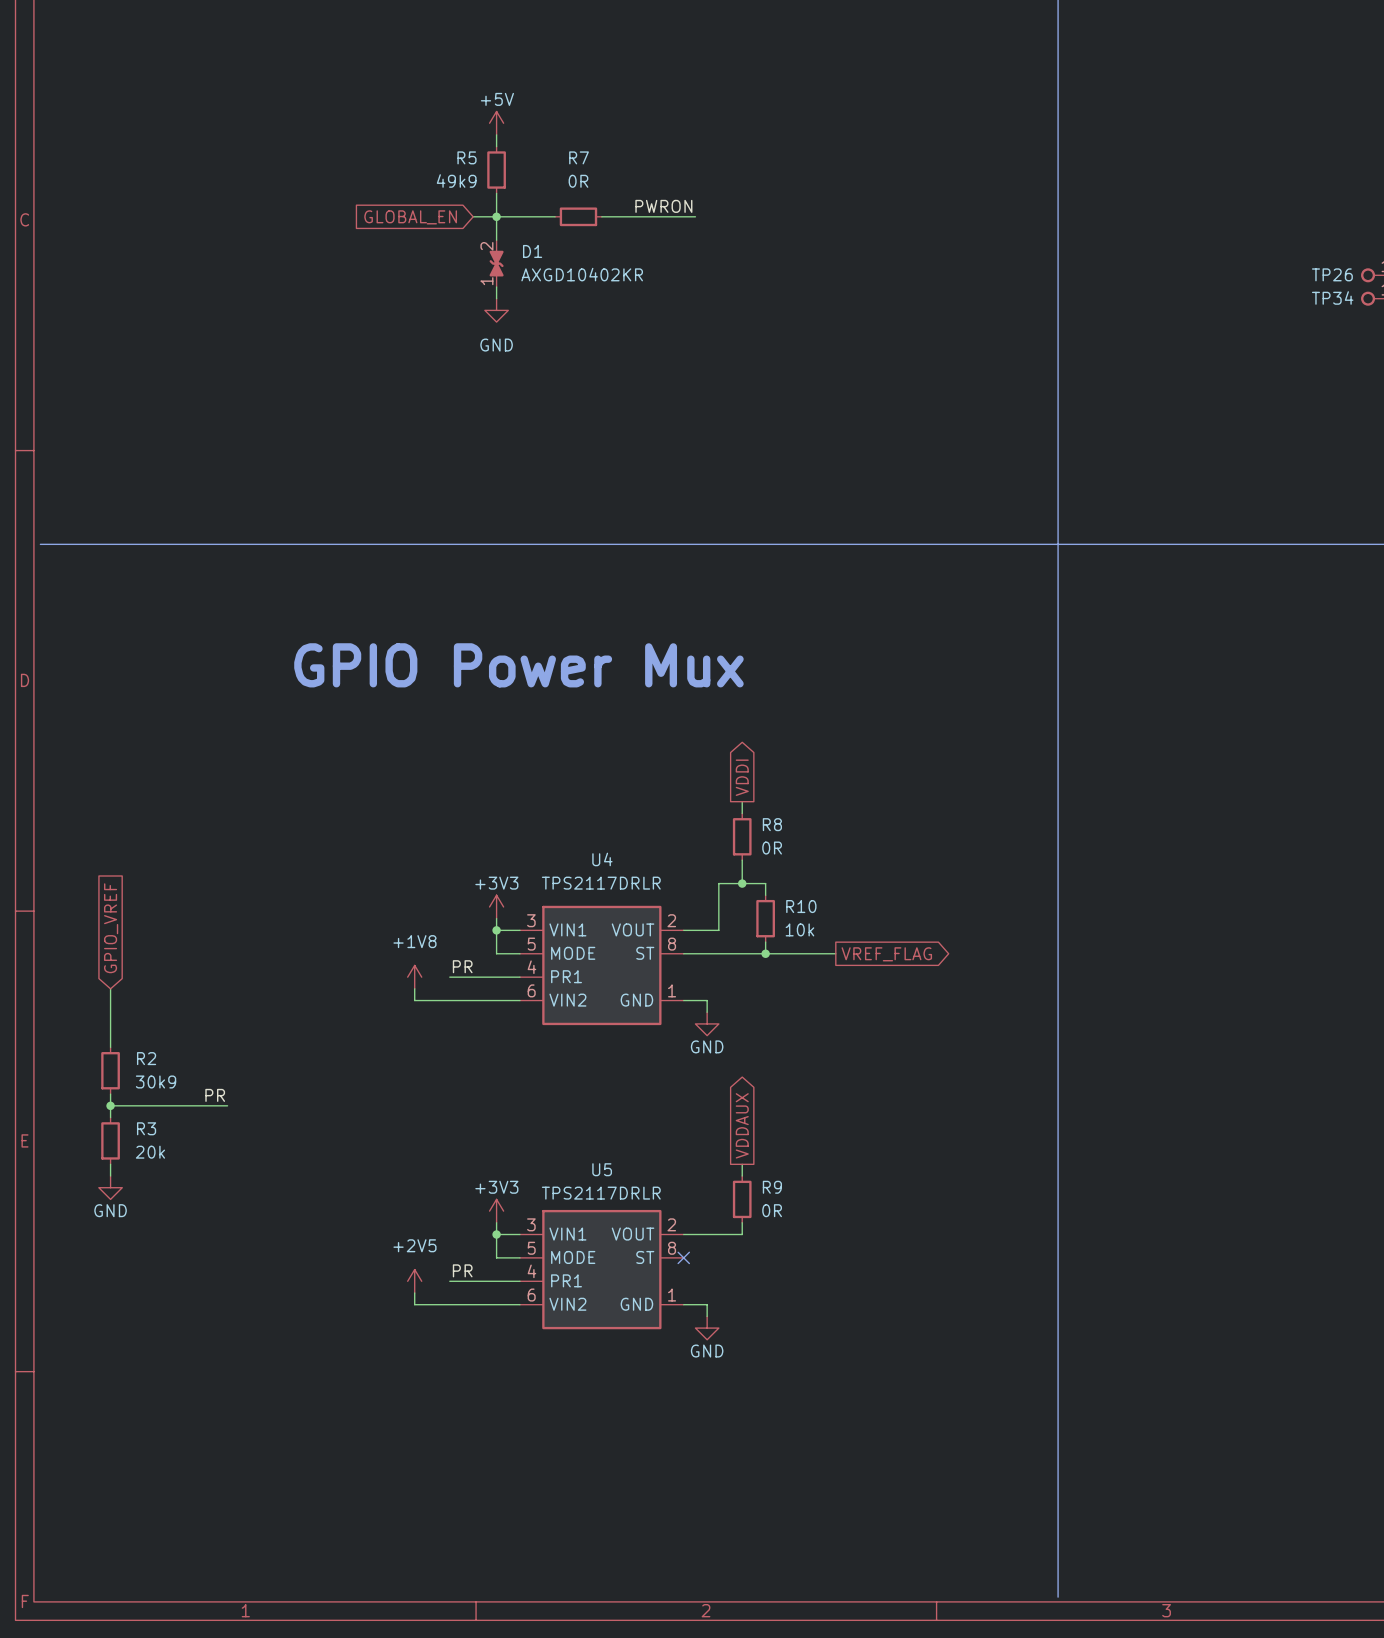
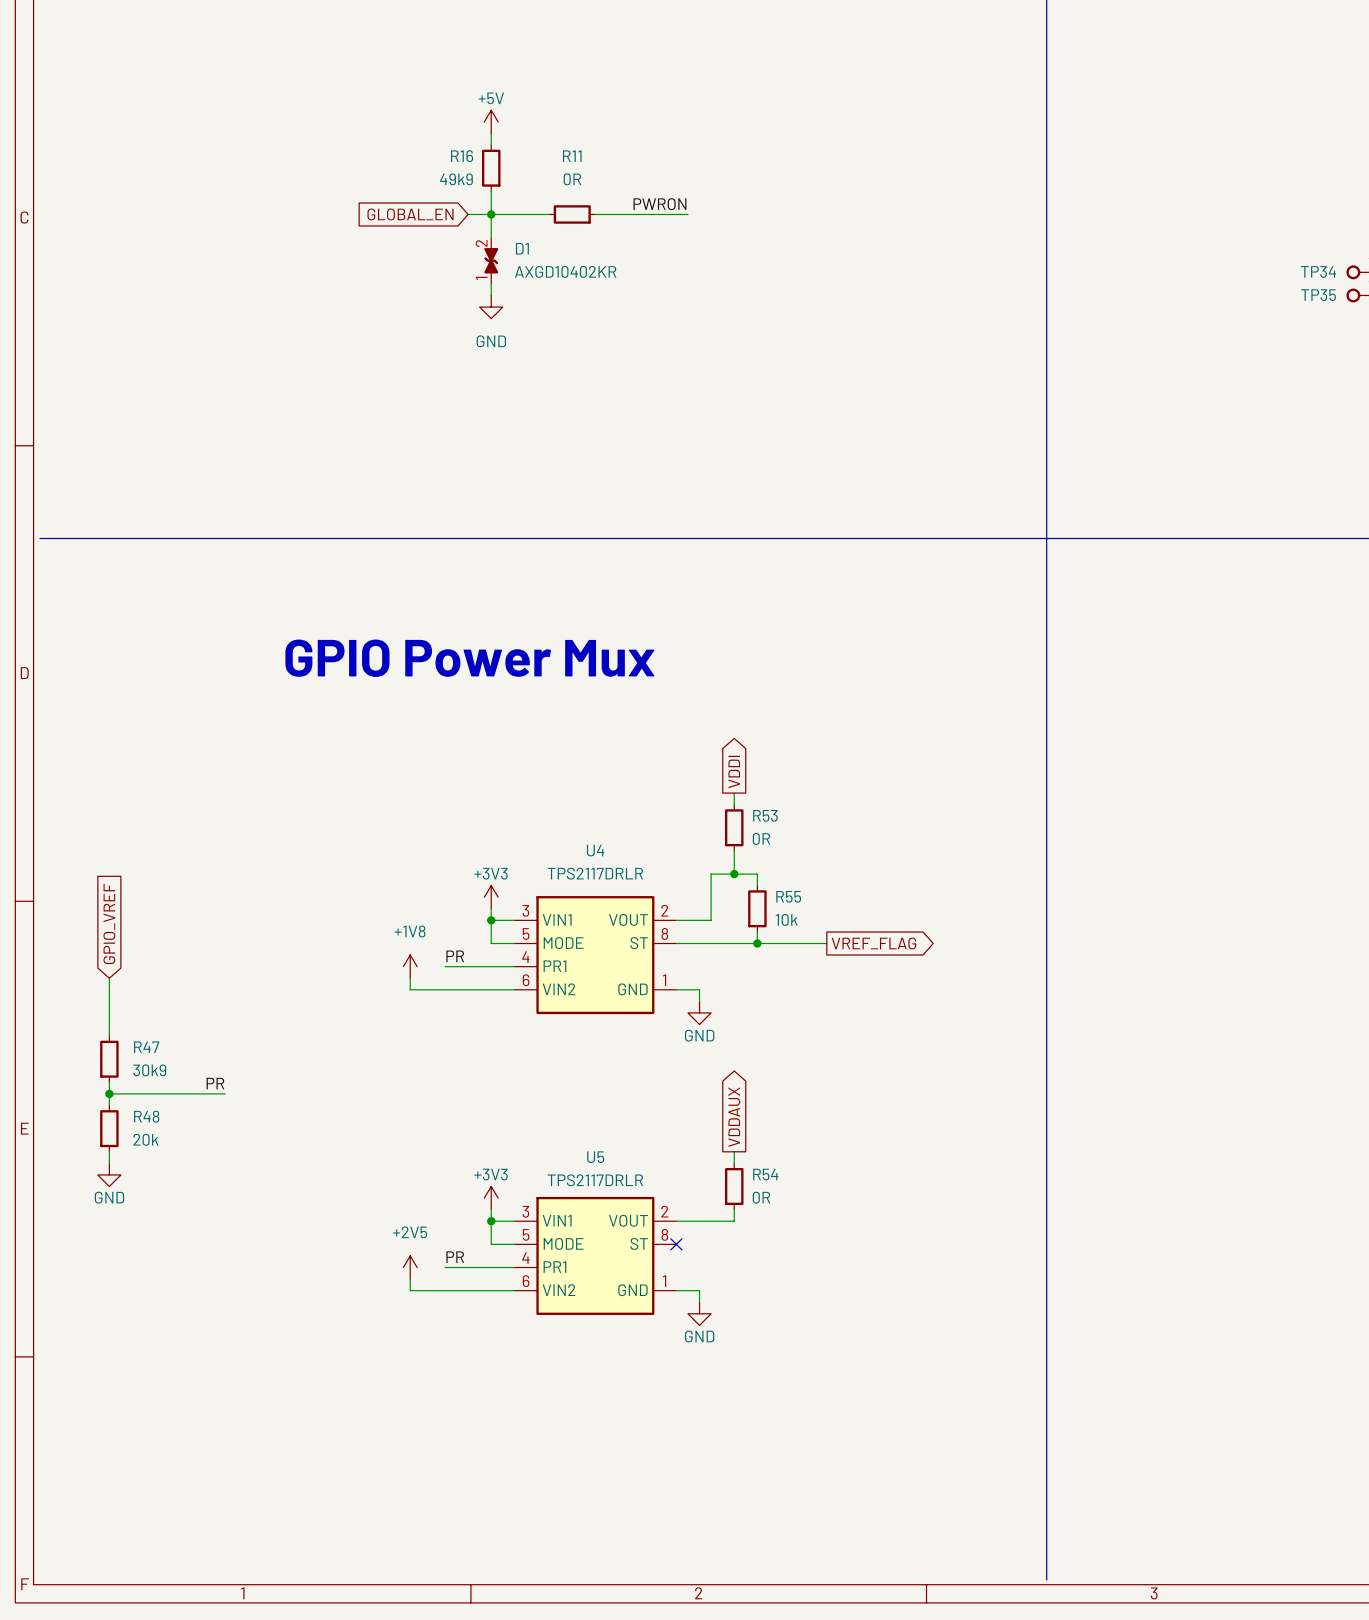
R5 name: R5 (466, 157) -> R16 (462, 156)
R7 name: R7 (579, 157) -> R11 (572, 156)
TP26 name: TP26 (1332, 274) -> TP34 (1318, 271)
TP34 name: TP34 (1332, 297) -> TP35 (1318, 295)
R8 name: R8 (772, 824) -> R53 (765, 815)
R10 name: R10 (801, 906) -> R55 (788, 896)
R2 name: R2 (146, 1058) -> R47 (146, 1047)
R3 name: R3 (146, 1128) -> R48 (146, 1116)
R9 name: R9 (772, 1187) -> R54 (765, 1174)

